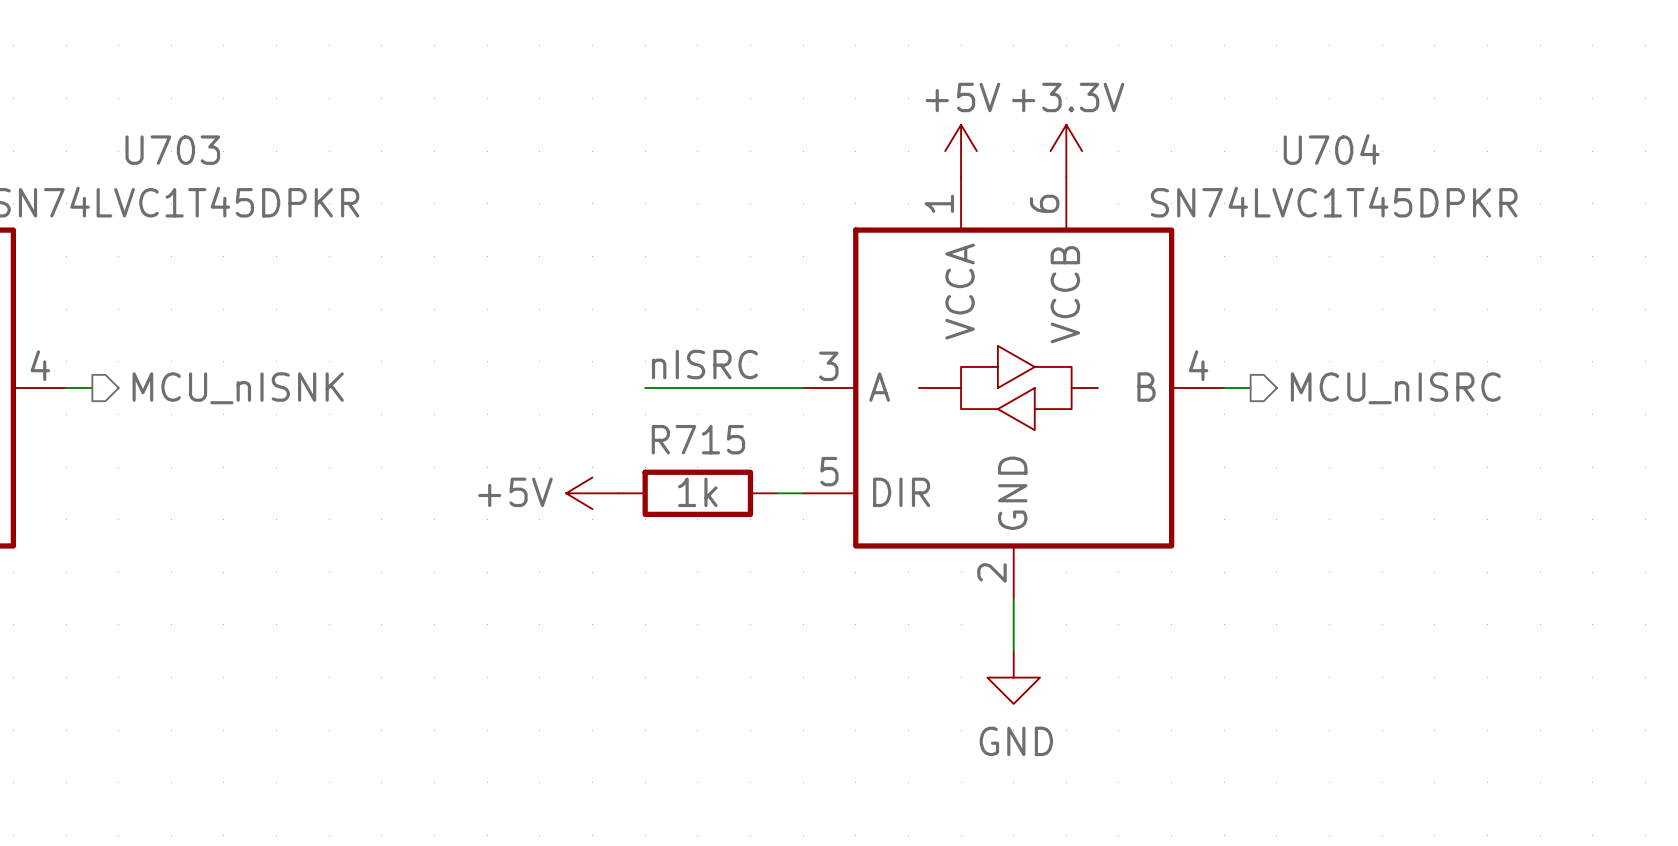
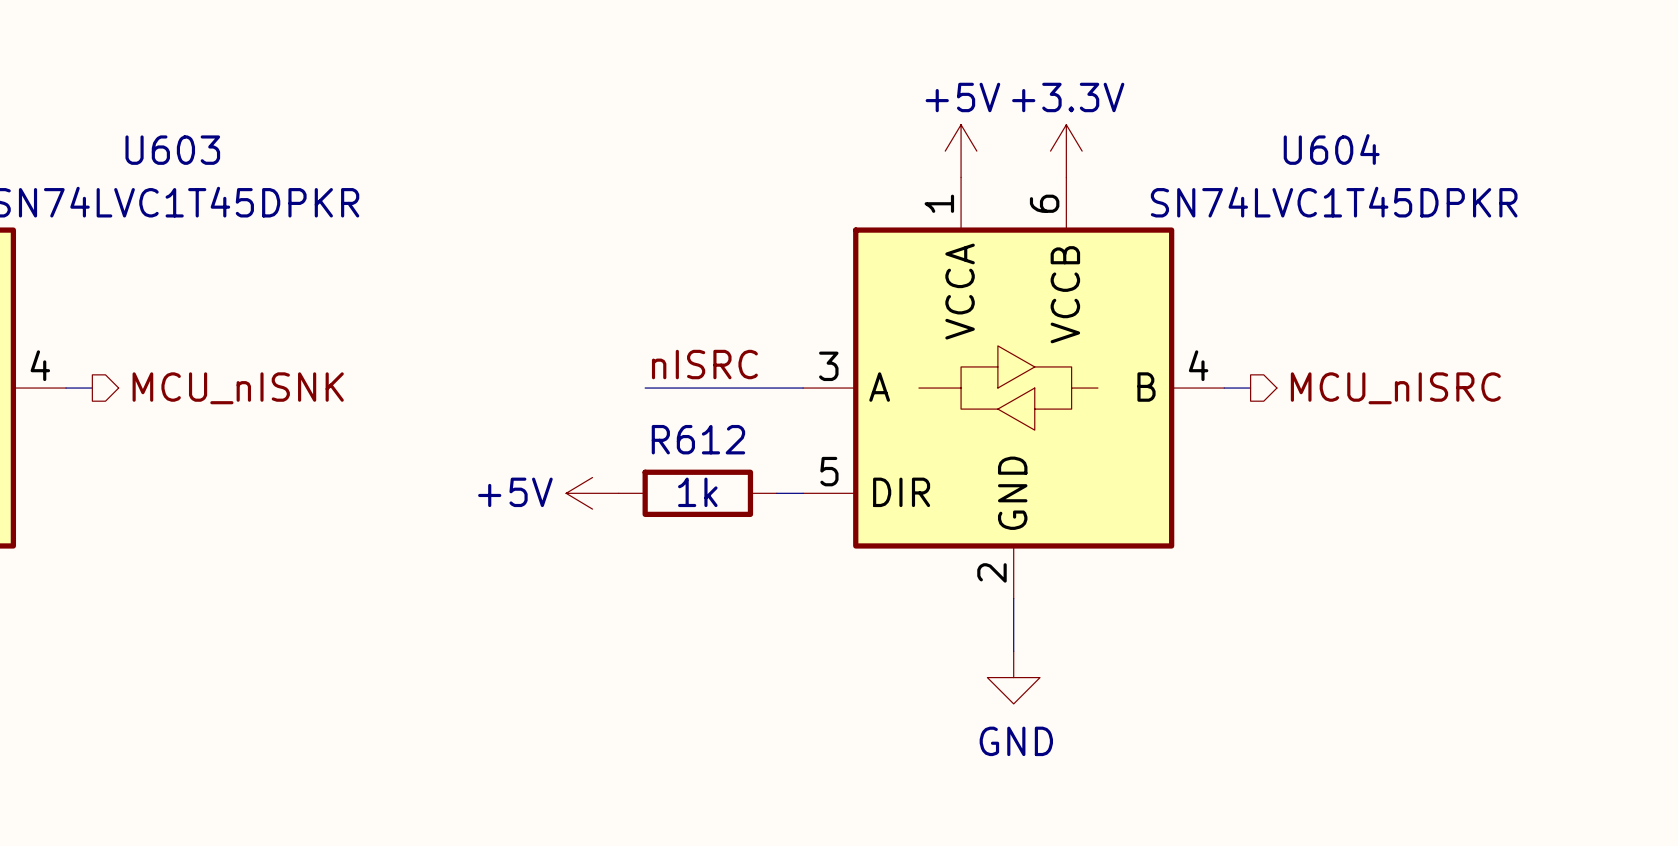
U704 name: U704 (1331, 149) -> U604 (1331, 149)
U703 name: U703 (172, 150) -> U603 (172, 150)
R715 name: R715 (698, 439) -> R612 (698, 439)

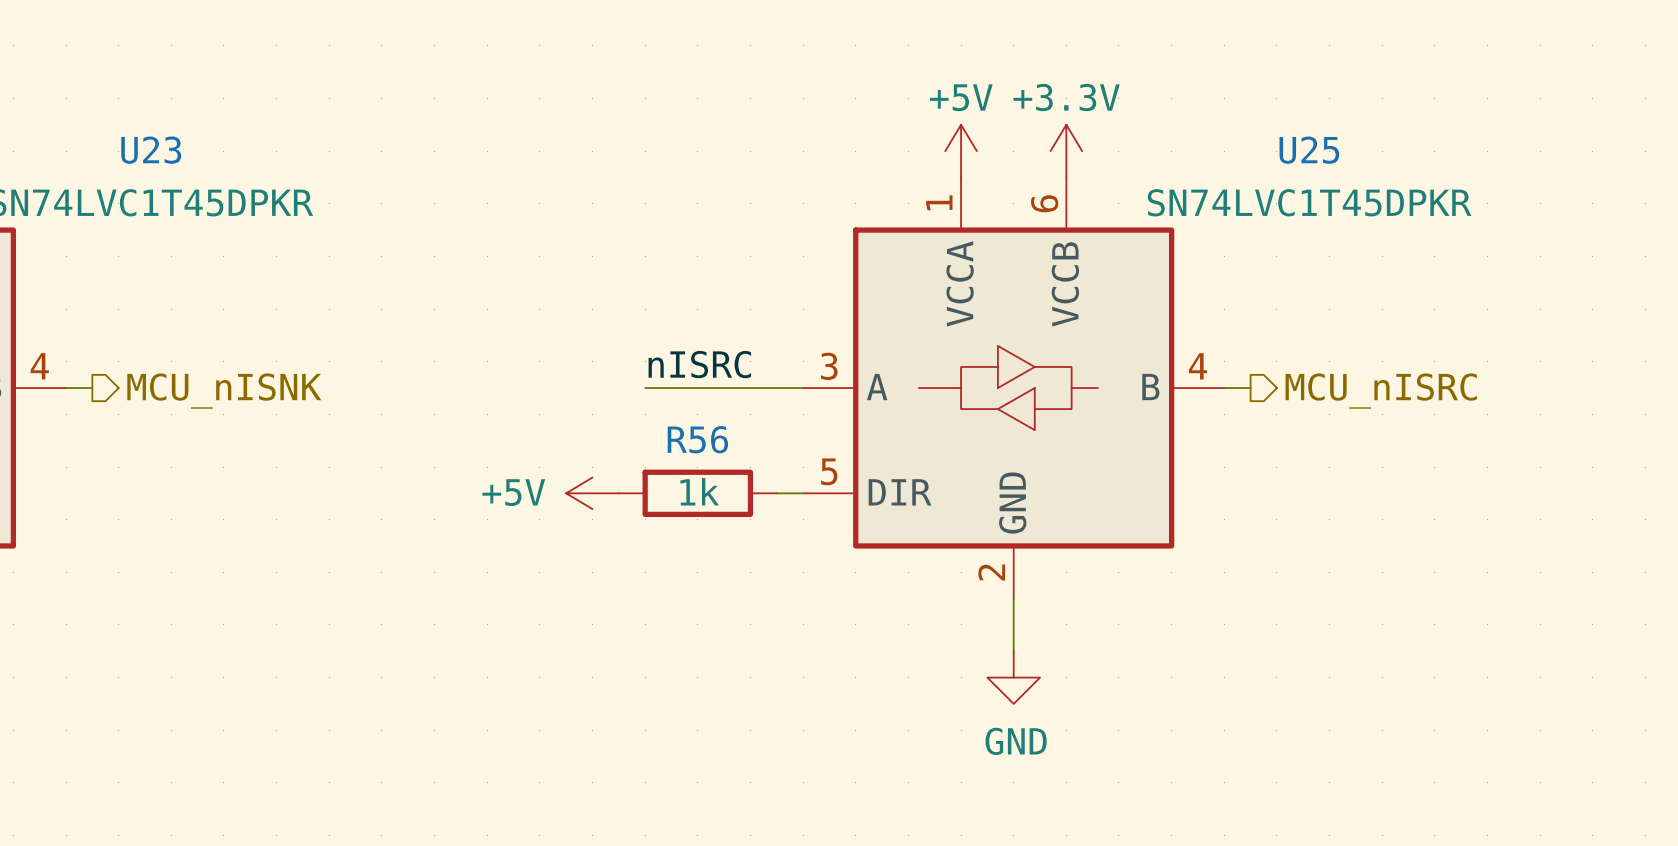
U604 name: U604 (1331, 149) -> U25 (1309, 150)
U603 name: U603 (172, 150) -> U23 (151, 150)
R612 name: R612 (698, 439) -> R56 (697, 439)

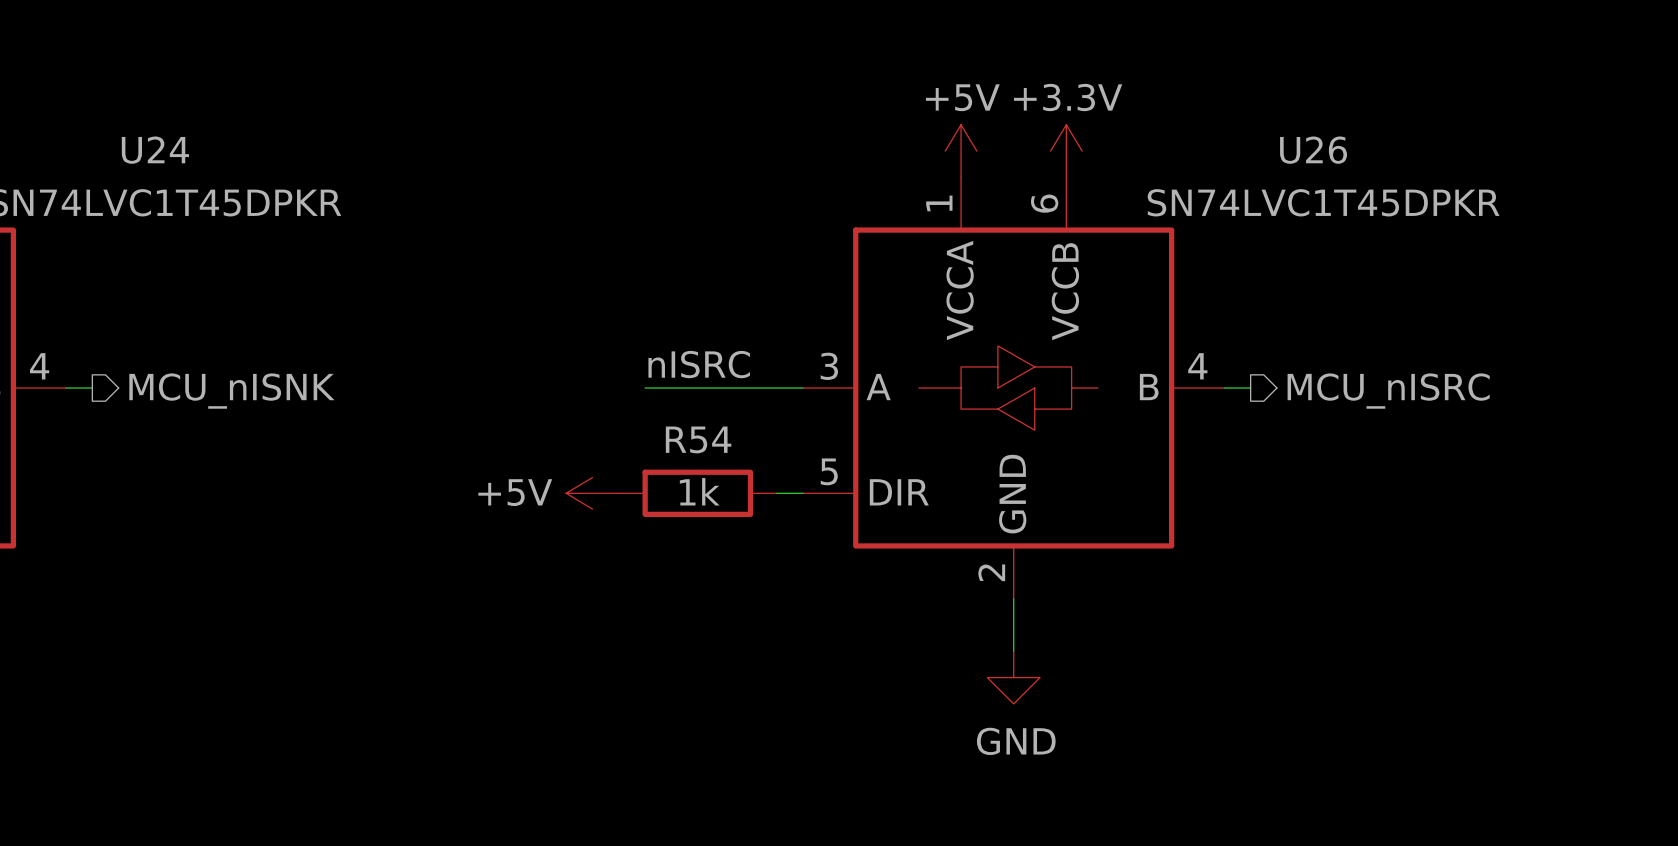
U23 name: U23 (151, 150) -> U24 (155, 150)
U25 name: U25 (1309, 150) -> U26 (1313, 150)
R56 name: R56 (697, 439) -> R54 (698, 439)

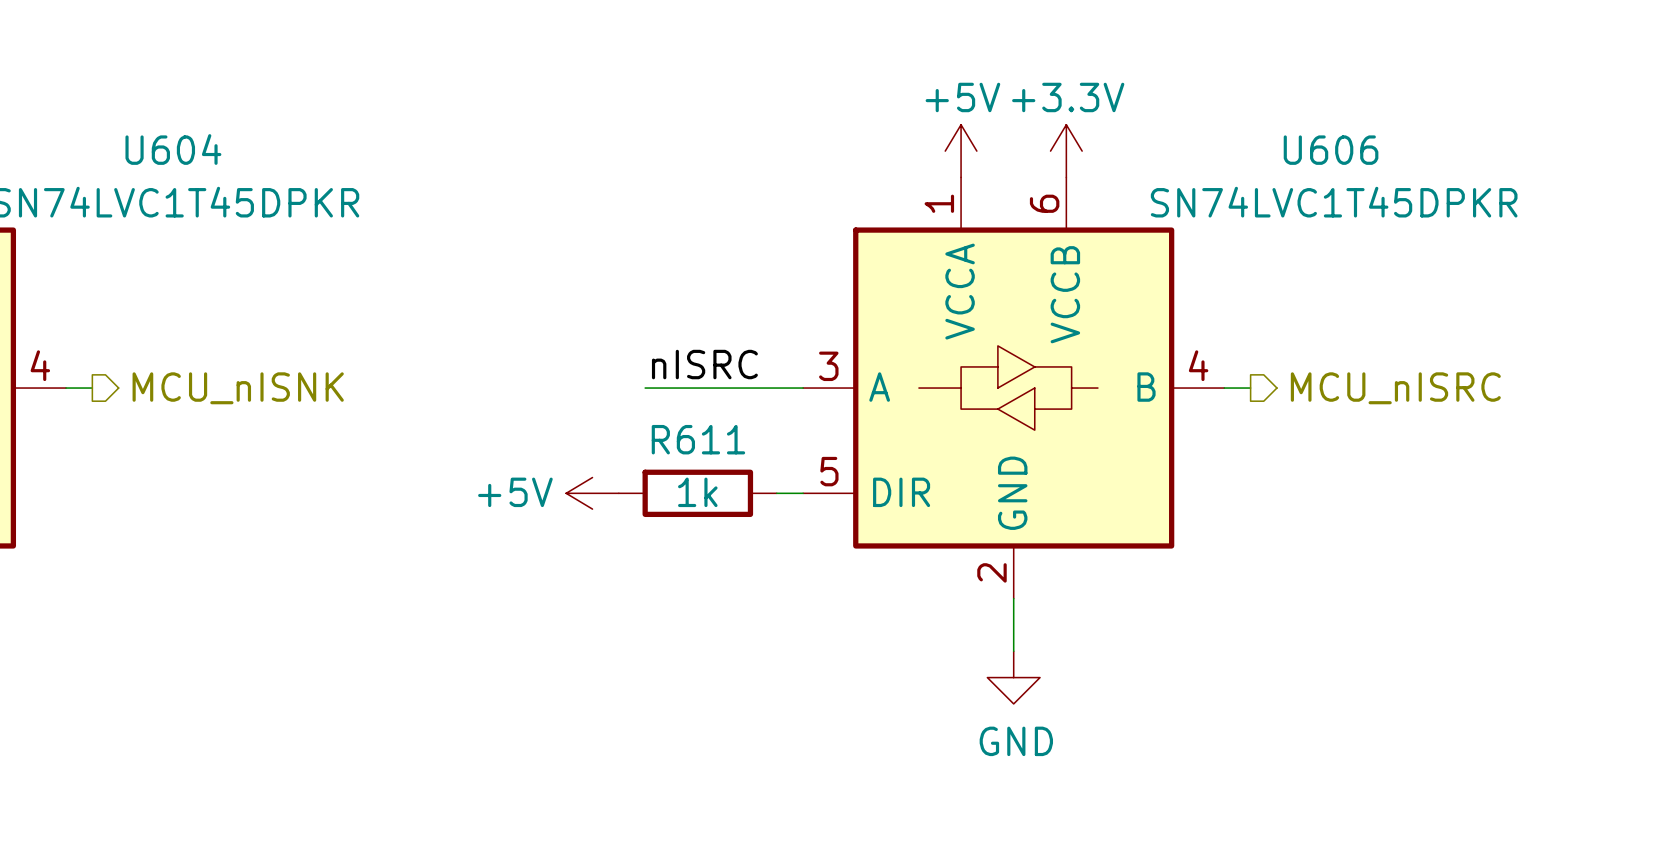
U24 name: U24 (155, 150) -> U604 (173, 149)
U26 name: U26 (1313, 150) -> U606 (1331, 150)
R54 name: R54 (698, 439) -> R611 (698, 439)

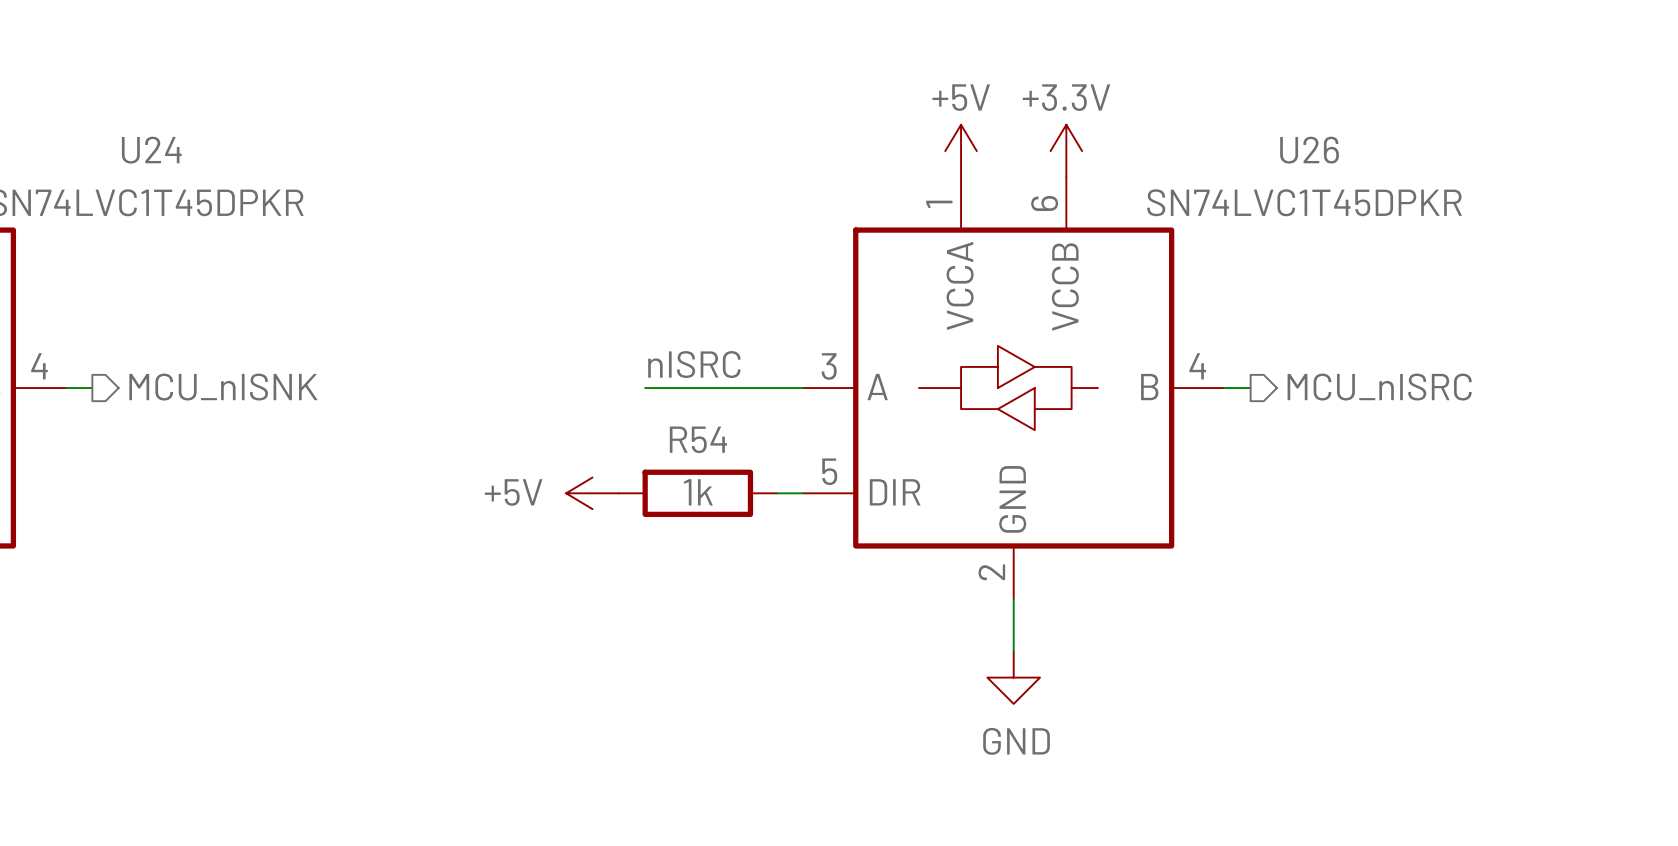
U604 name: U604 (173, 149) -> U24 (151, 150)
U606 name: U606 (1331, 150) -> U26 (1309, 150)
R611 name: R611 (698, 439) -> R54 (698, 439)

